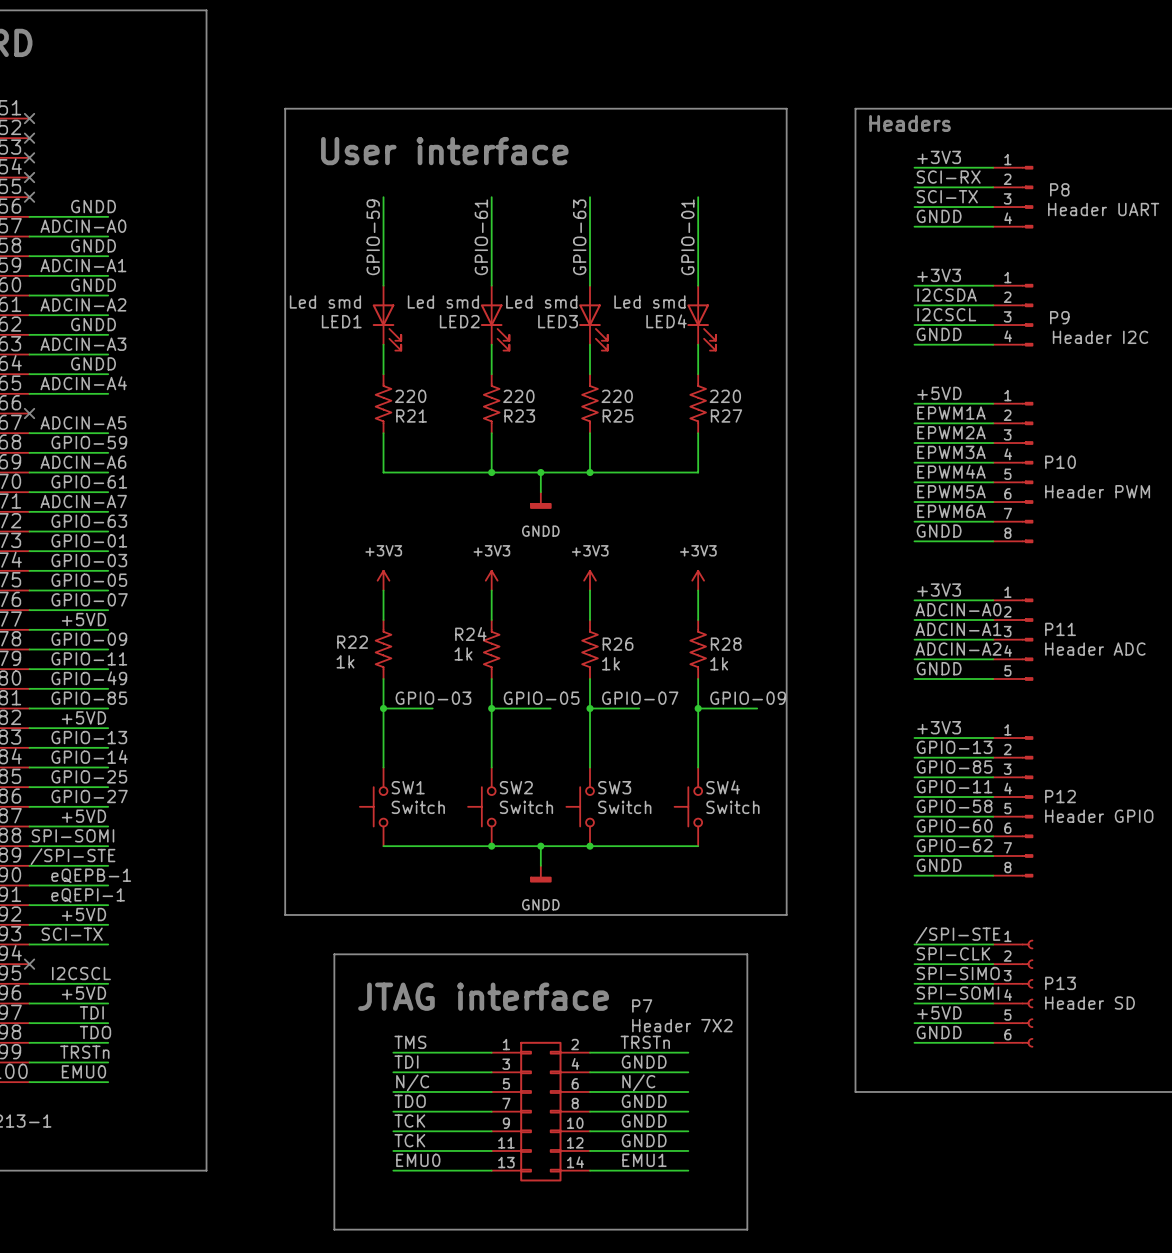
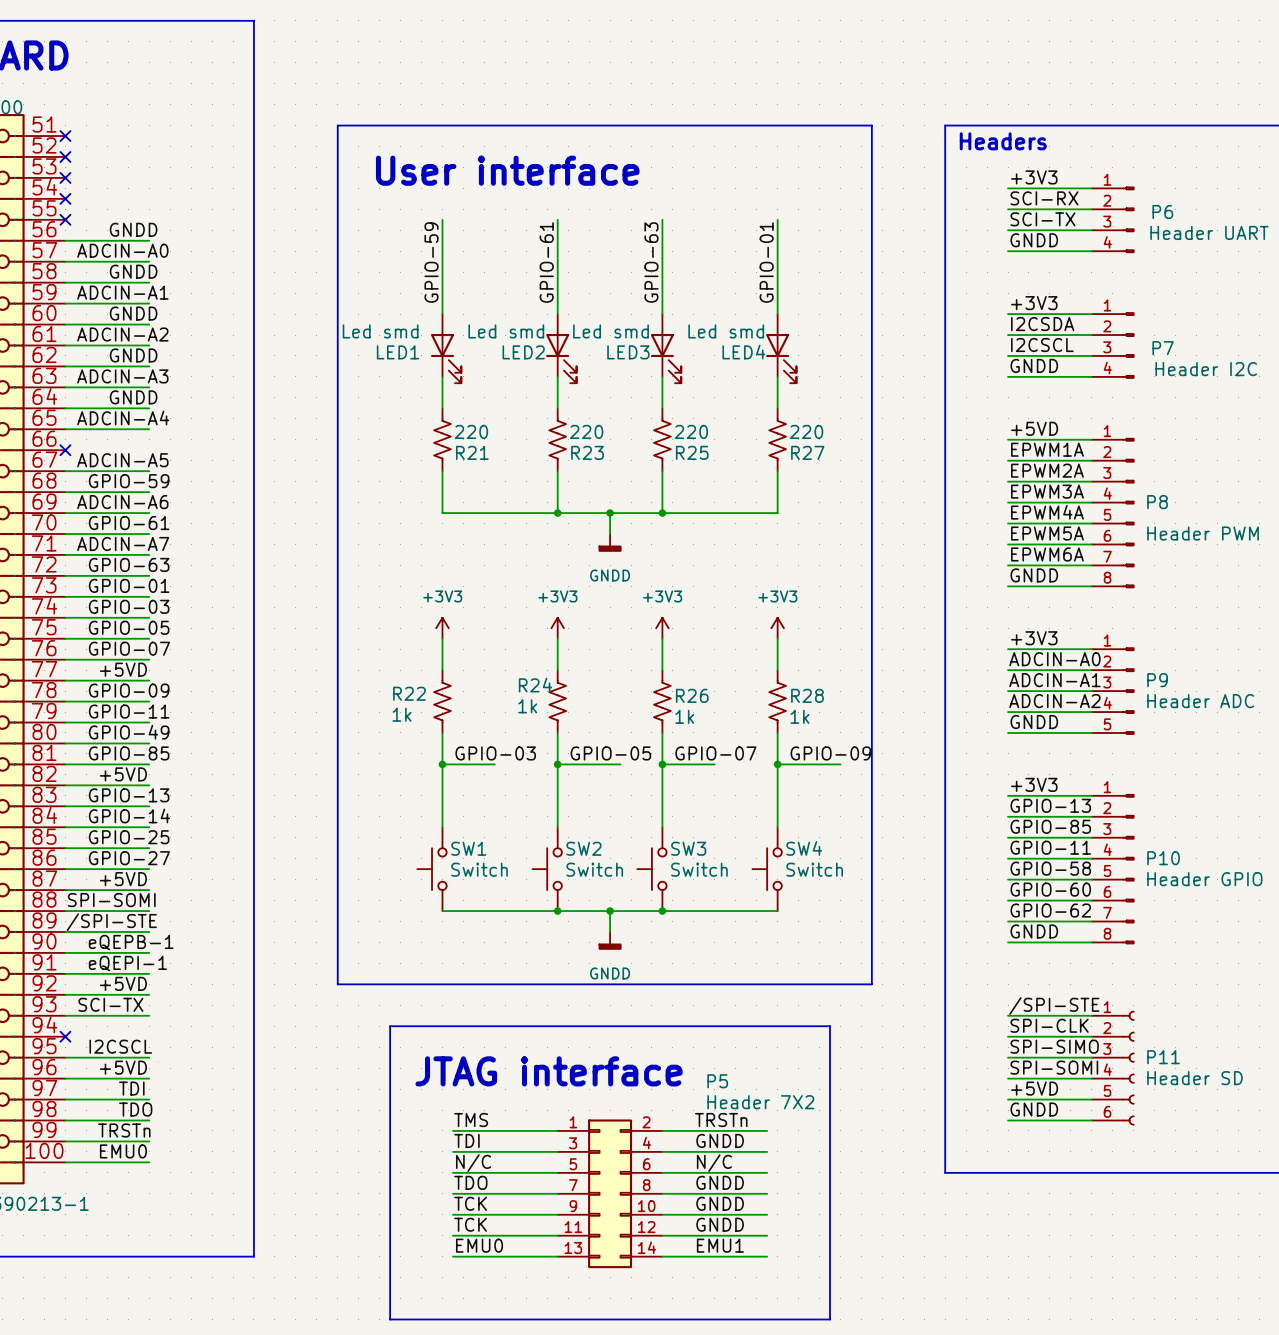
P8 name: P8 (1059, 189) -> P6 (1162, 211)
P9 name: P9 (1059, 317) -> P7 (1163, 348)
P10 name: P10 (1060, 462) -> P8 (1157, 502)
P11 name: P11 (1060, 629) -> P9 (1157, 680)
P12 name: P12 (1060, 796) -> P10 (1163, 858)
P13 name: P13 (1060, 983) -> P11 (1163, 1057)
P7 name: P7 (642, 1005) -> P5 (717, 1081)

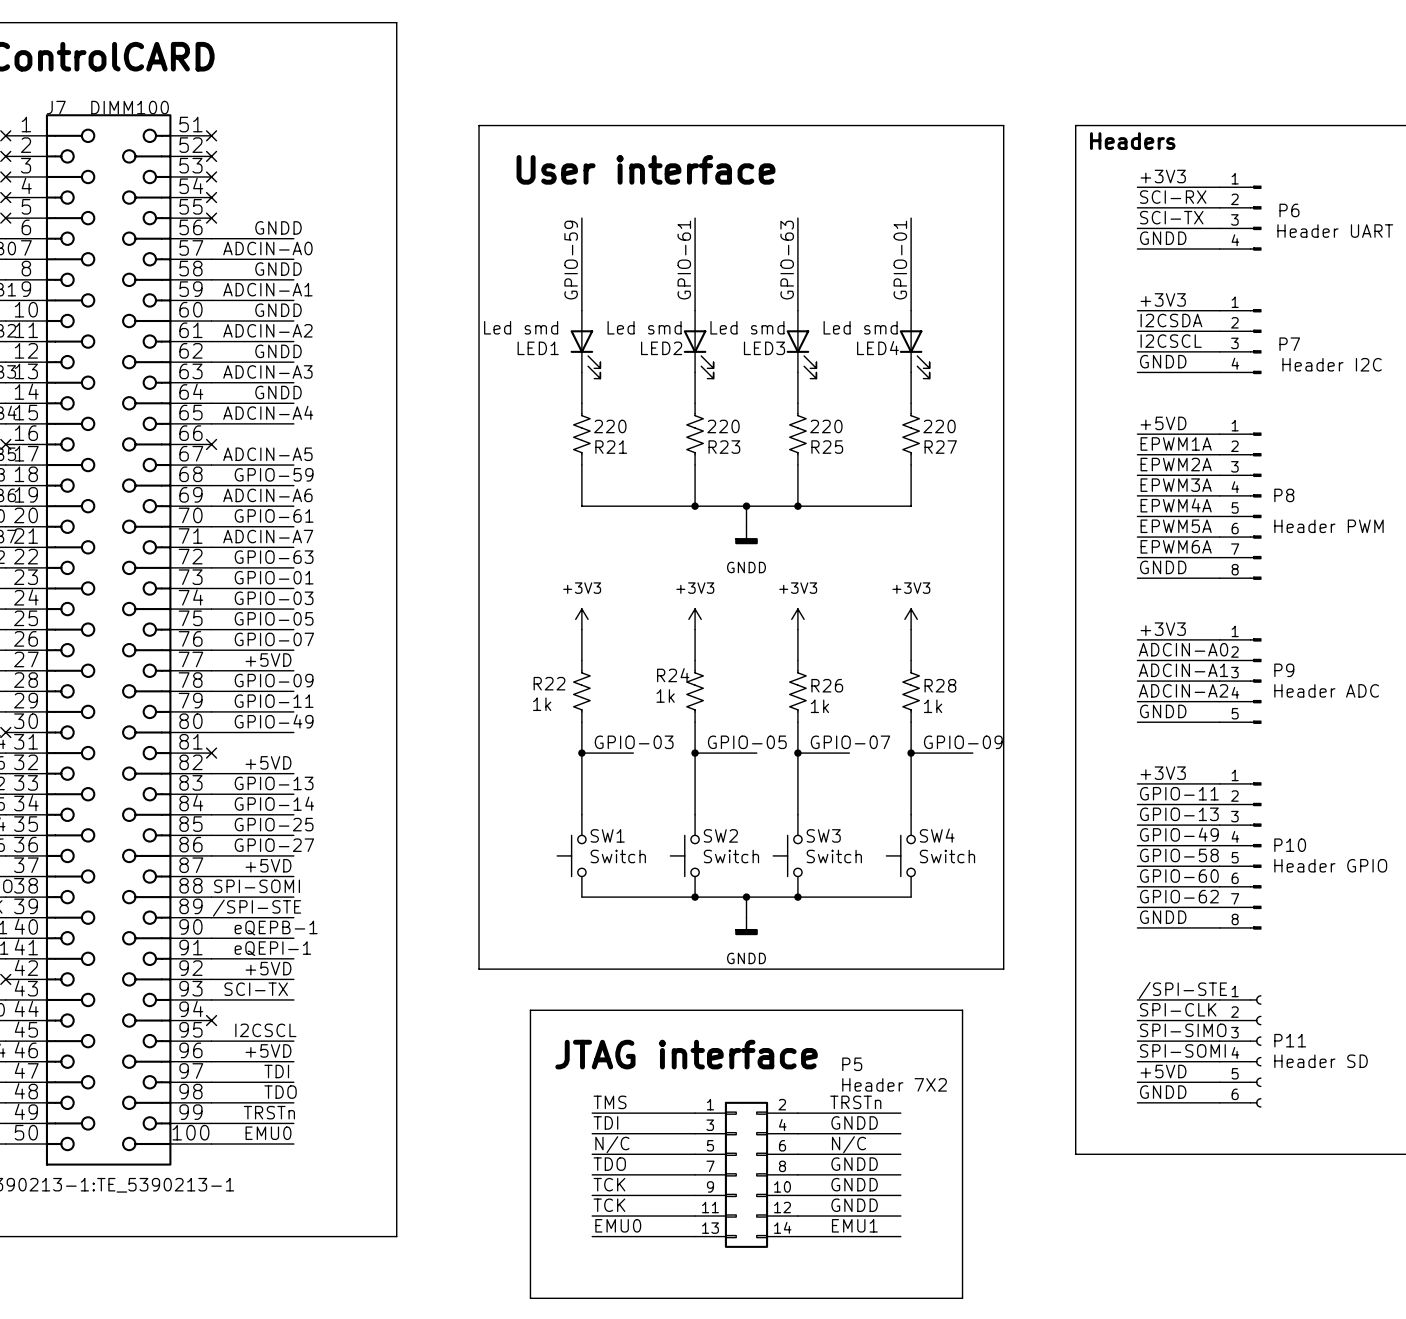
label: GPIO-85 (129, 753) -> none
wire: (65, 764) (149, 764) -> none
no-connect mark: none -> (211, 753)
label: GPIO-13 (1050, 805) -> GPIO-11 (1179, 793)
label: GPIO-85 (1050, 826) -> GPIO-13 (1179, 814)
label: GPIO-11 (1050, 847) -> GPIO-49 (1179, 834)

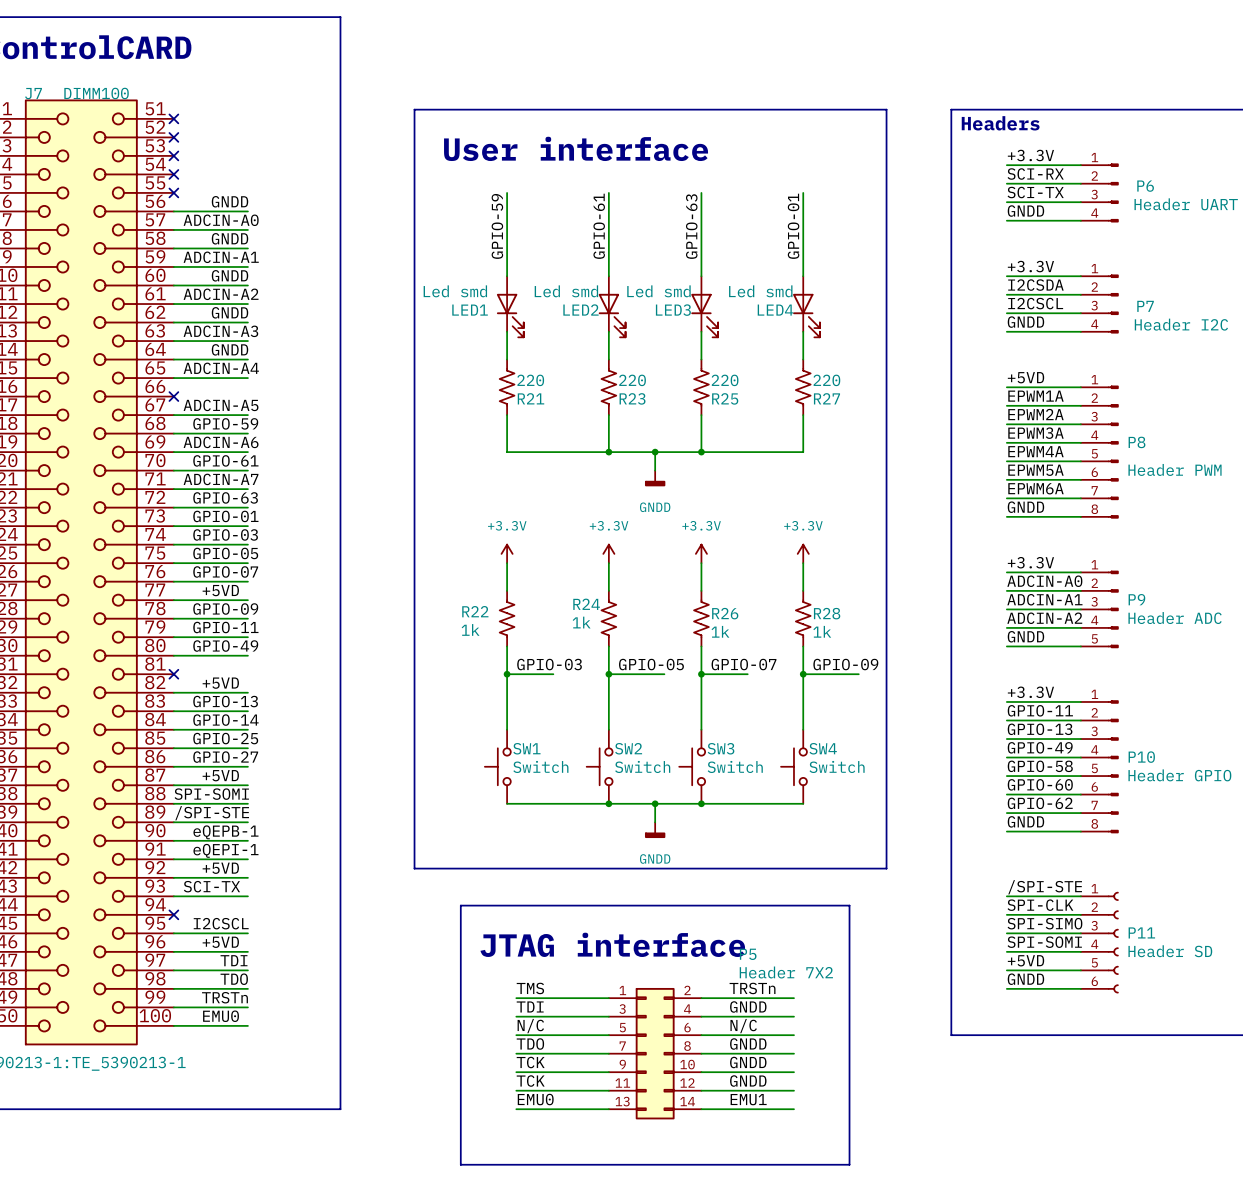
label: +3V3 (1163, 176) -> +3.3V (1030, 155)
label: +3V3 (1163, 299) -> +3.3V (1030, 266)
power symbol: +3V3 (581, 619) -> +3.3V (507, 553)
power symbol: +3V3 (695, 619) -> +3.3V (608, 553)
power symbol: +3V3 (797, 619) -> +3.3V (701, 553)
power symbol: +3V3 (911, 619) -> +3.3V (803, 553)
label: +3V3 (1163, 629) -> +3.3V (1030, 562)
label: +3V3 (1163, 773) -> +3.3V (1030, 692)

